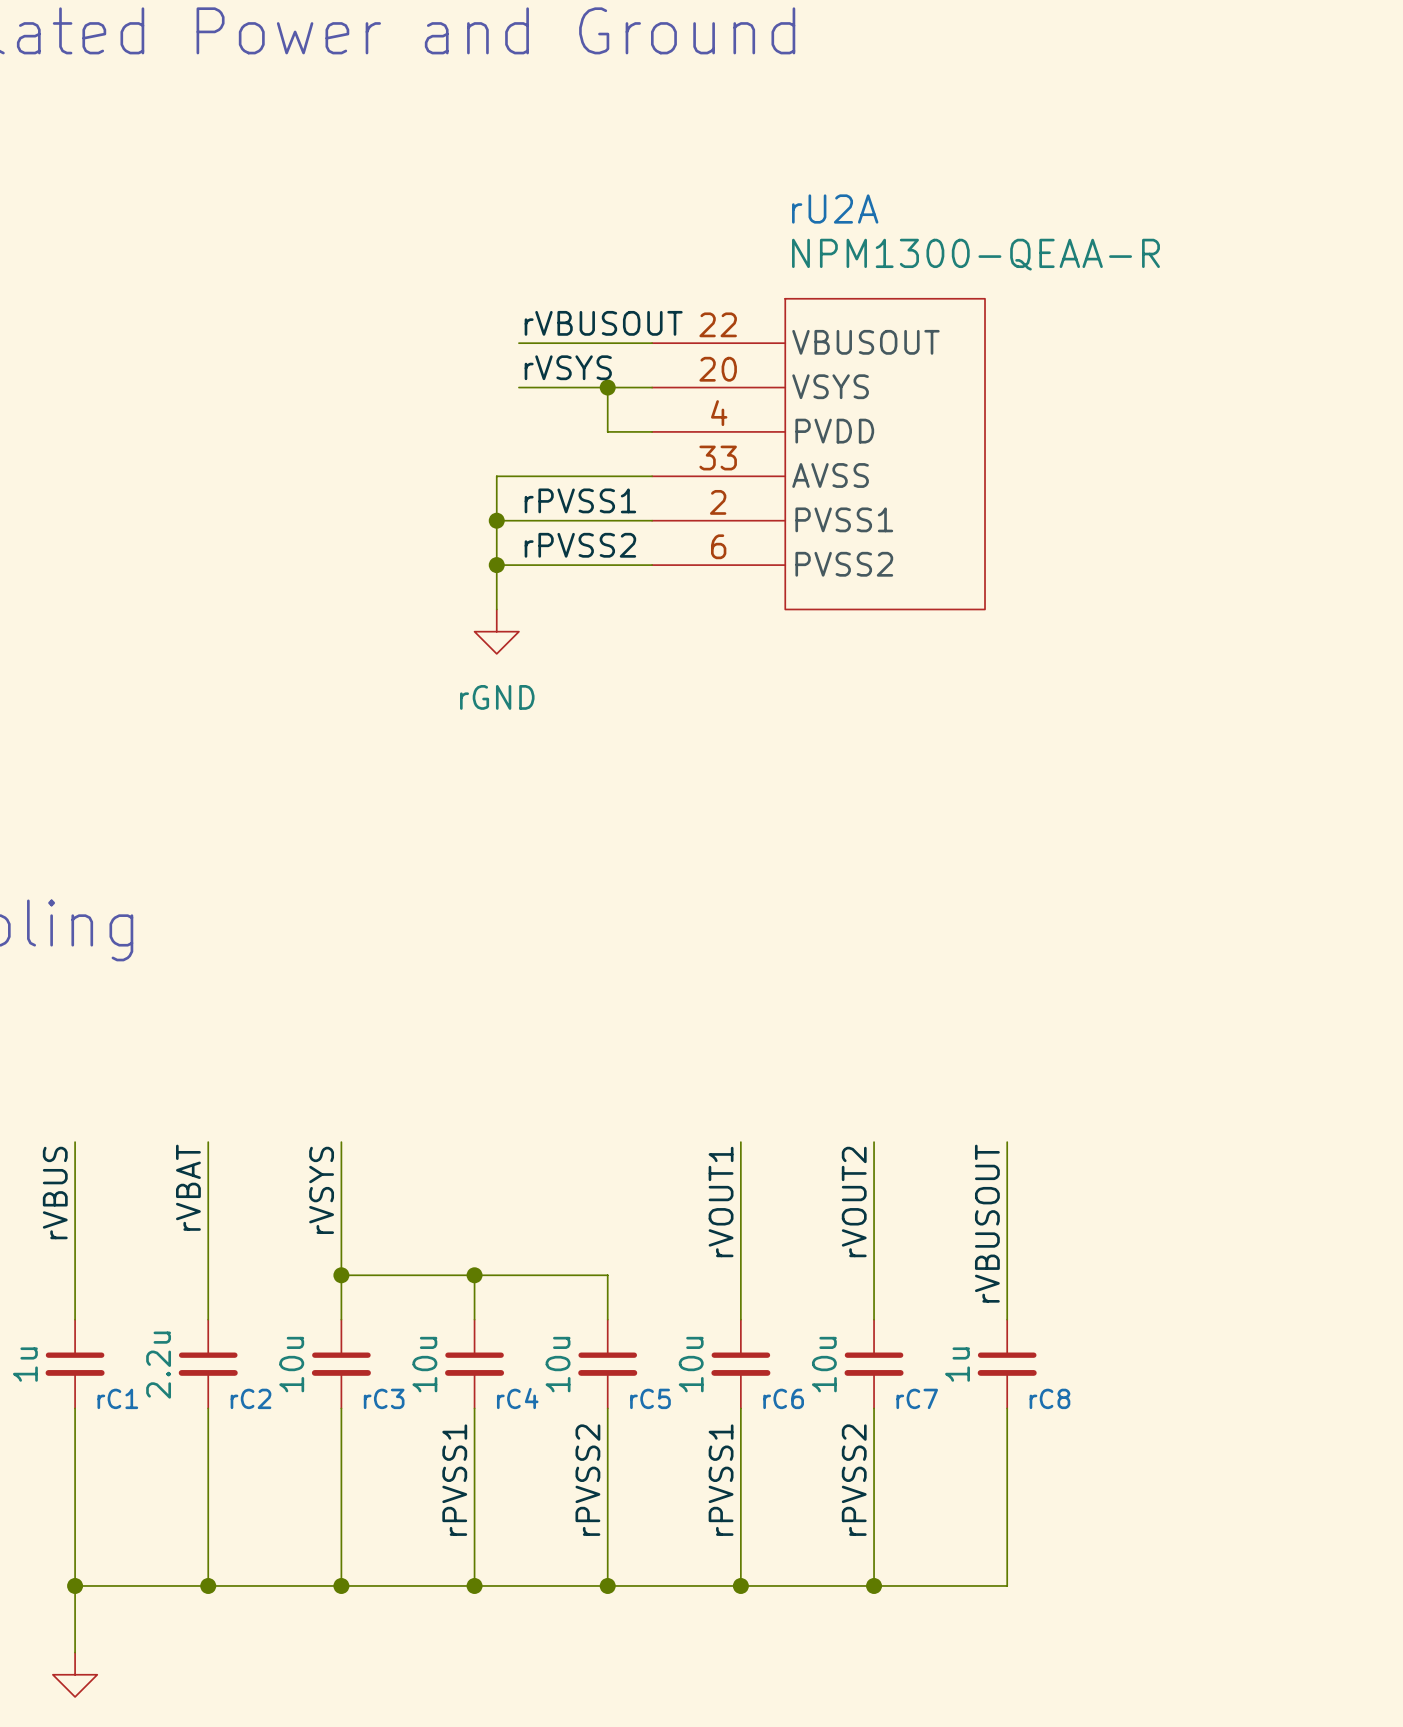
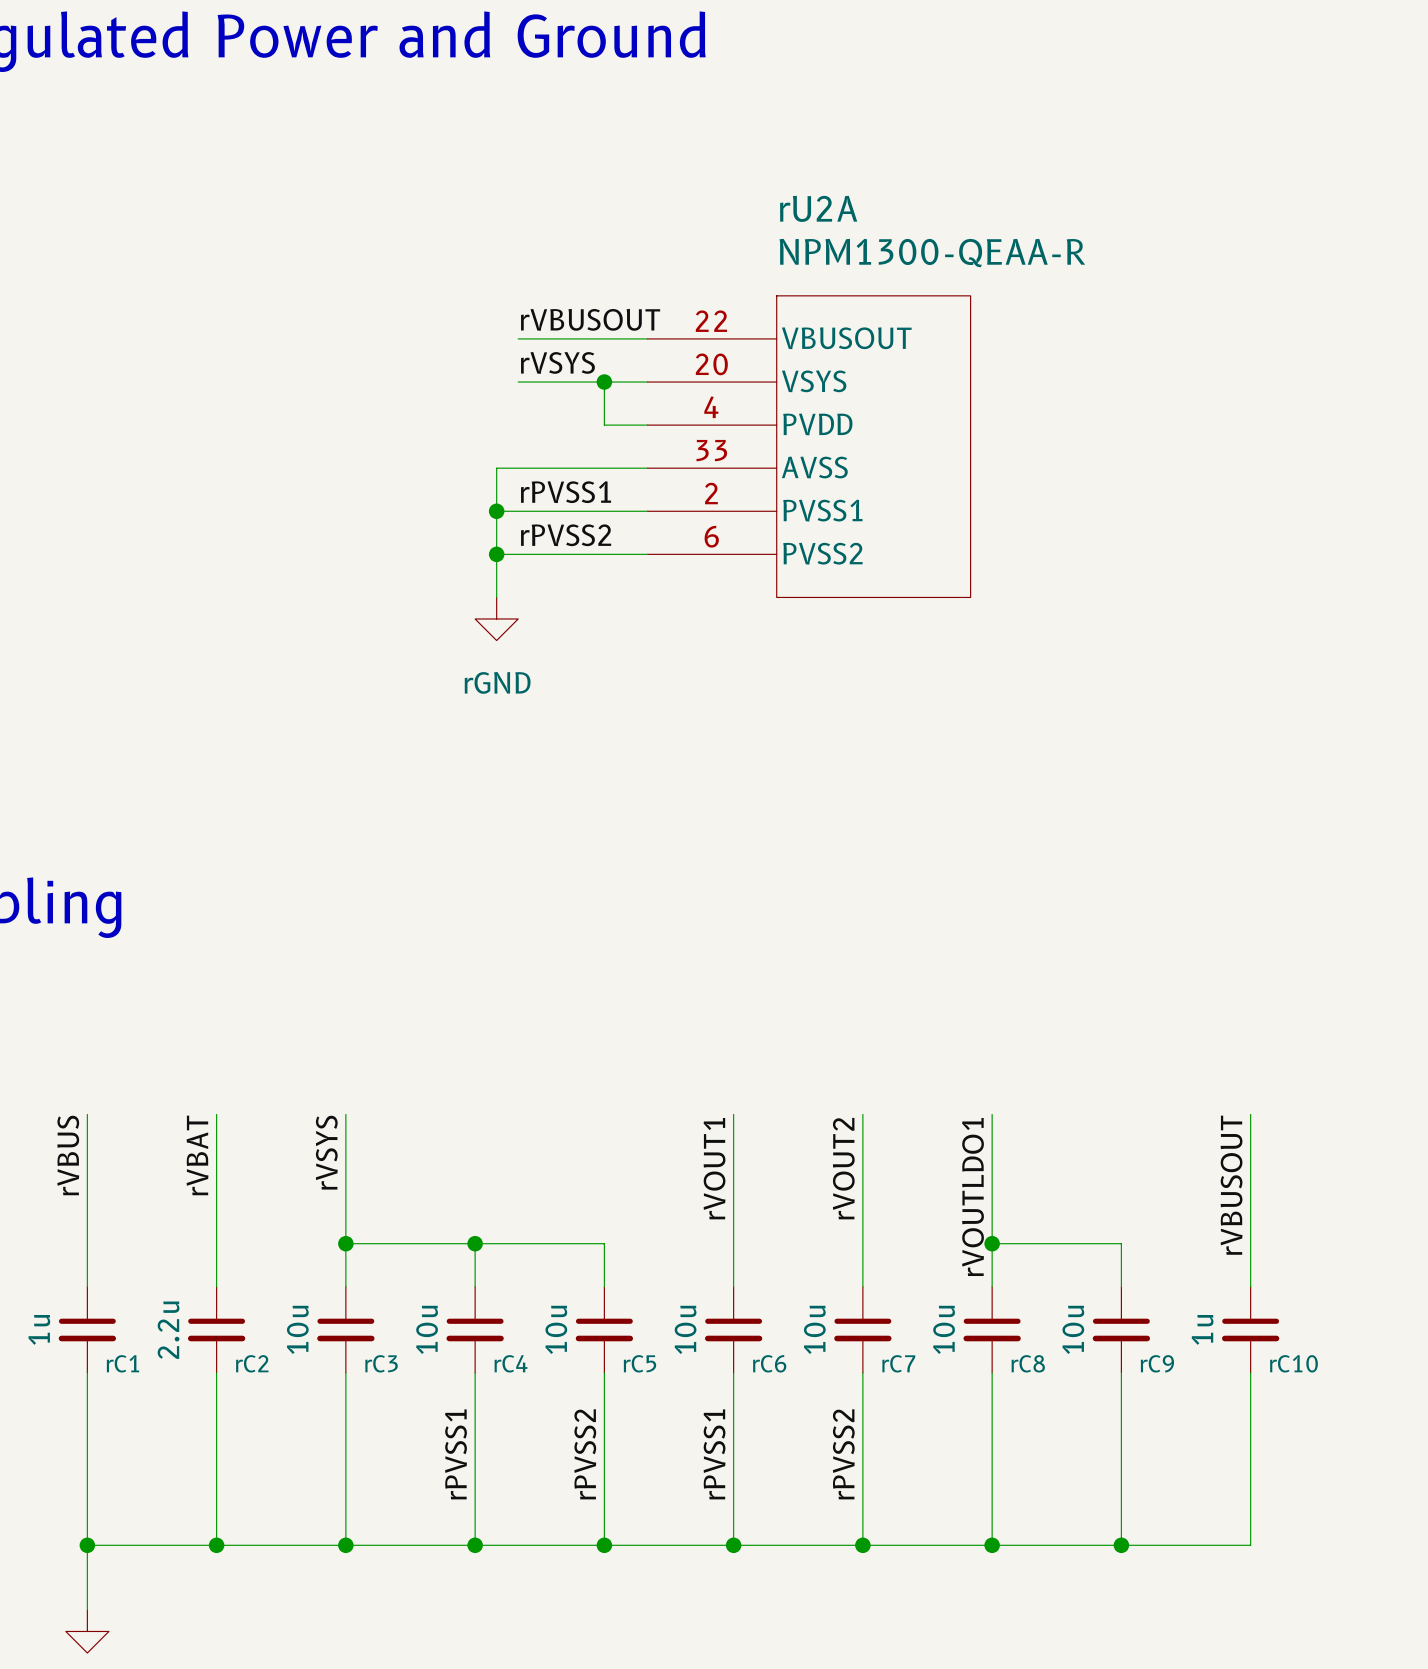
wire: none -> (1250, 1114) (1250, 1286)
label: rVBUSOUT (987, 1223) -> rVOUTLDO1 (973, 1197)
label: none -> rVBUSOUT (1231, 1185)
wire: none -> (992, 1243) (1121, 1243) (1121, 1286)
junction: none -> (992, 1243)
rC8 value: 1u (957, 1364) -> 10u (944, 1329)
rC9: none -> 10u (1121, 1329)
rC10: none -> 1u (1250, 1329)
wire: none -> (1121, 1372) (1121, 1545)
wire: none -> (1250, 1372) (1250, 1545) (992, 1545)
junction: none -> (992, 1545)
junction: none -> (1121, 1545)

